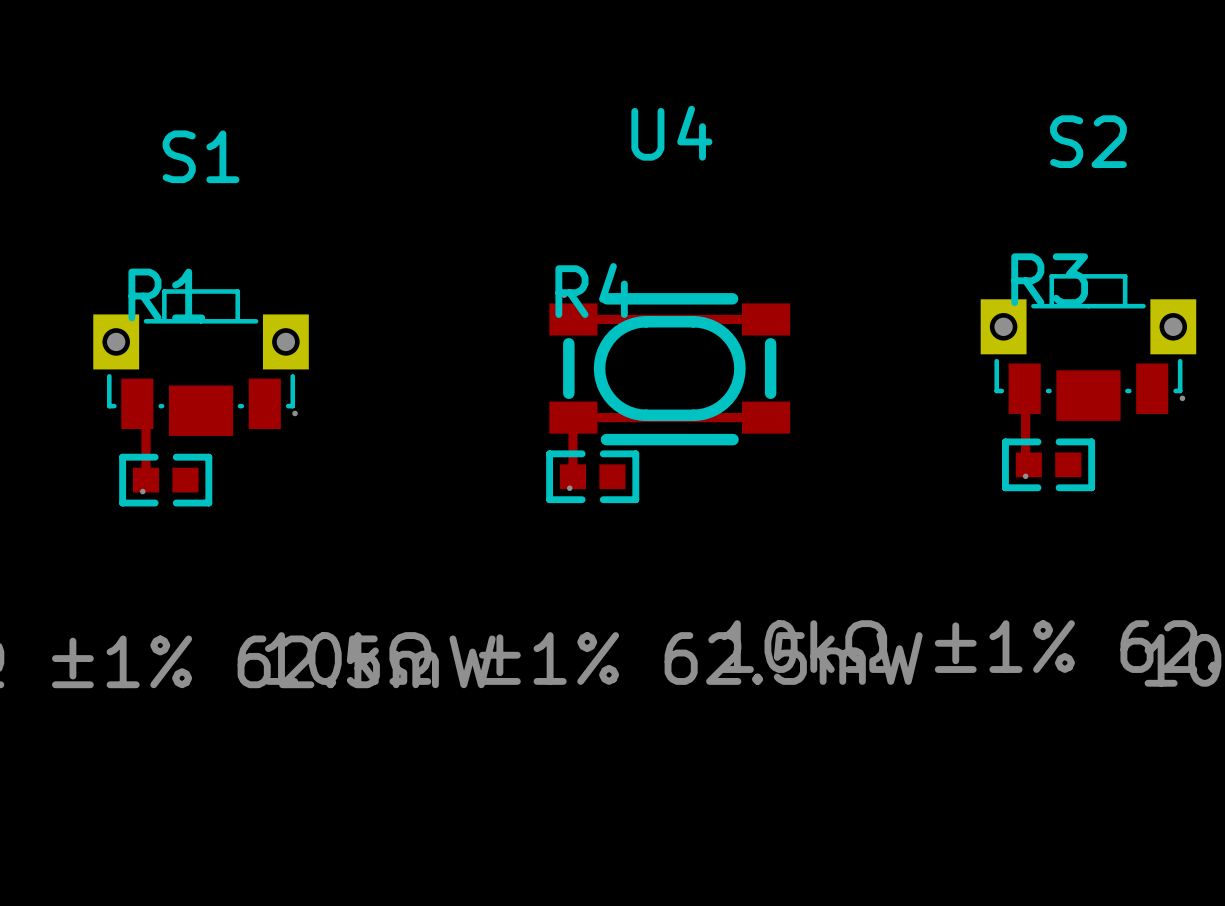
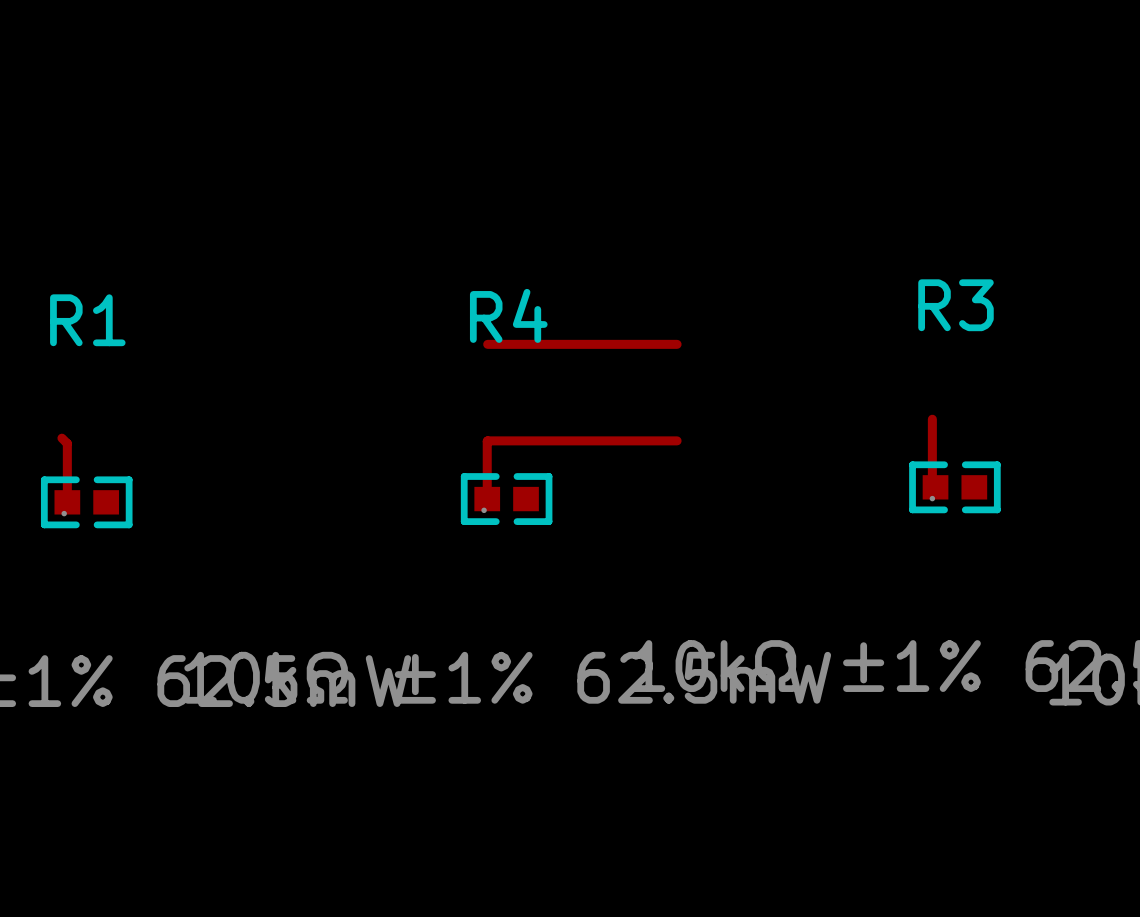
S2: (1088, 347) -> none
S1: (201, 362) -> none
U4: (669, 368) -> none

